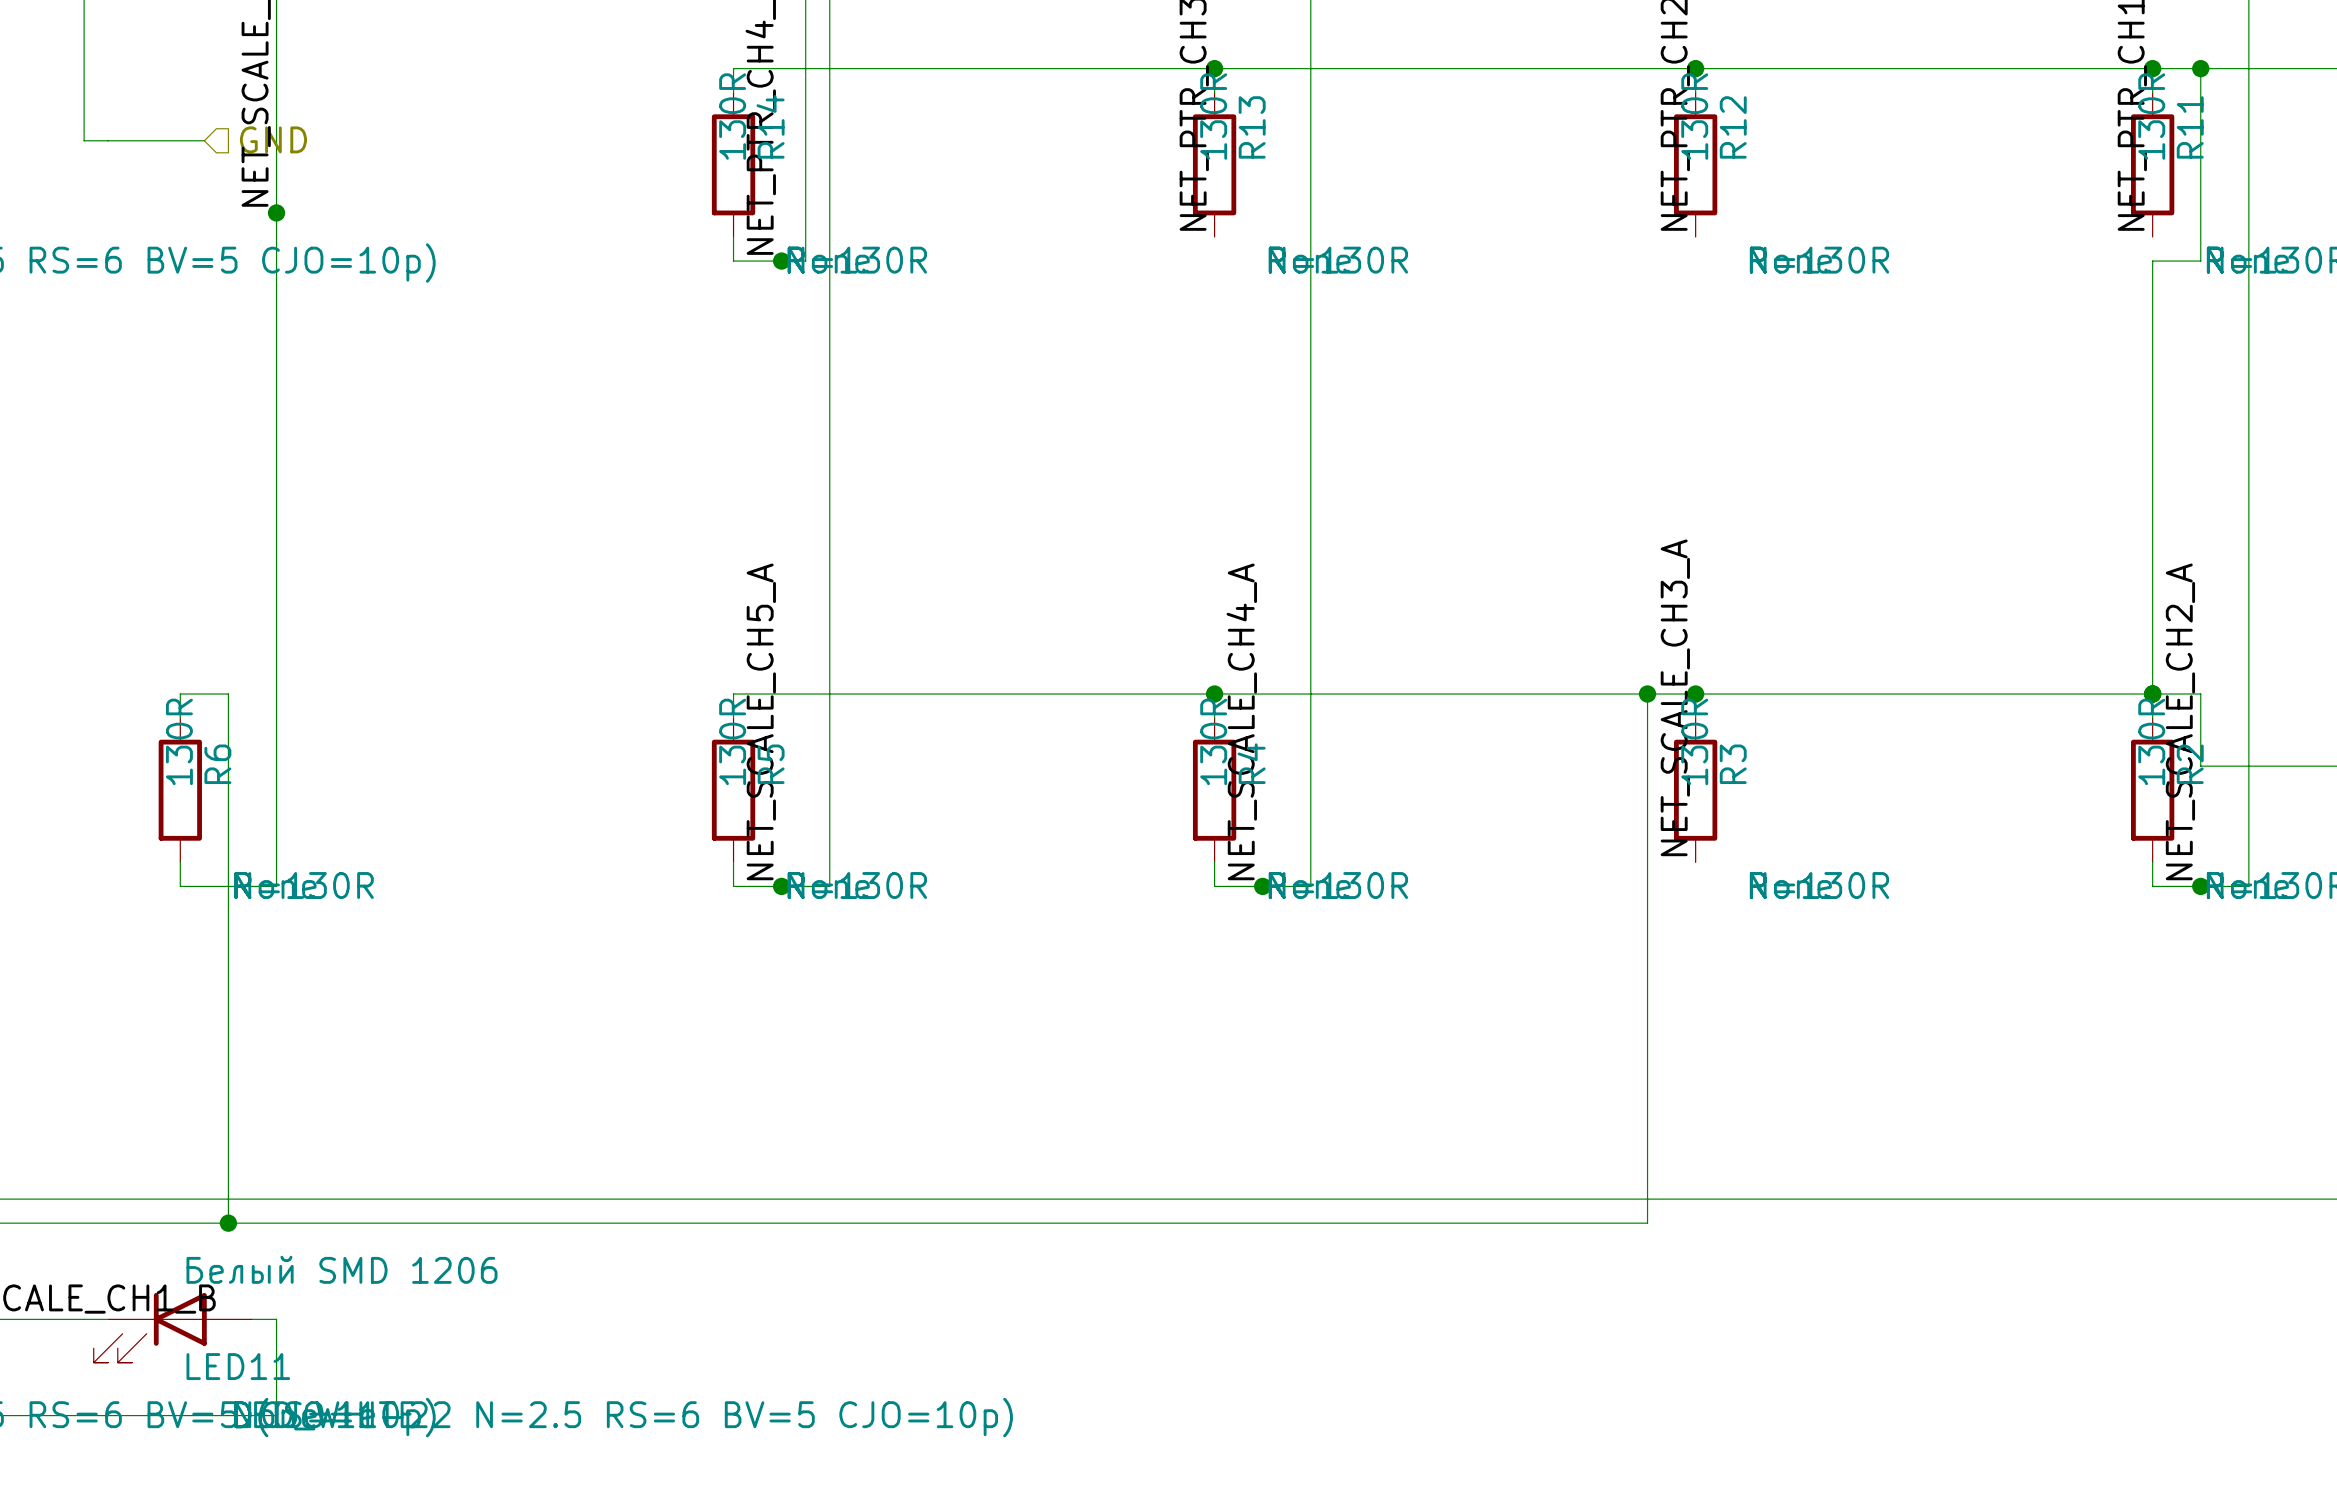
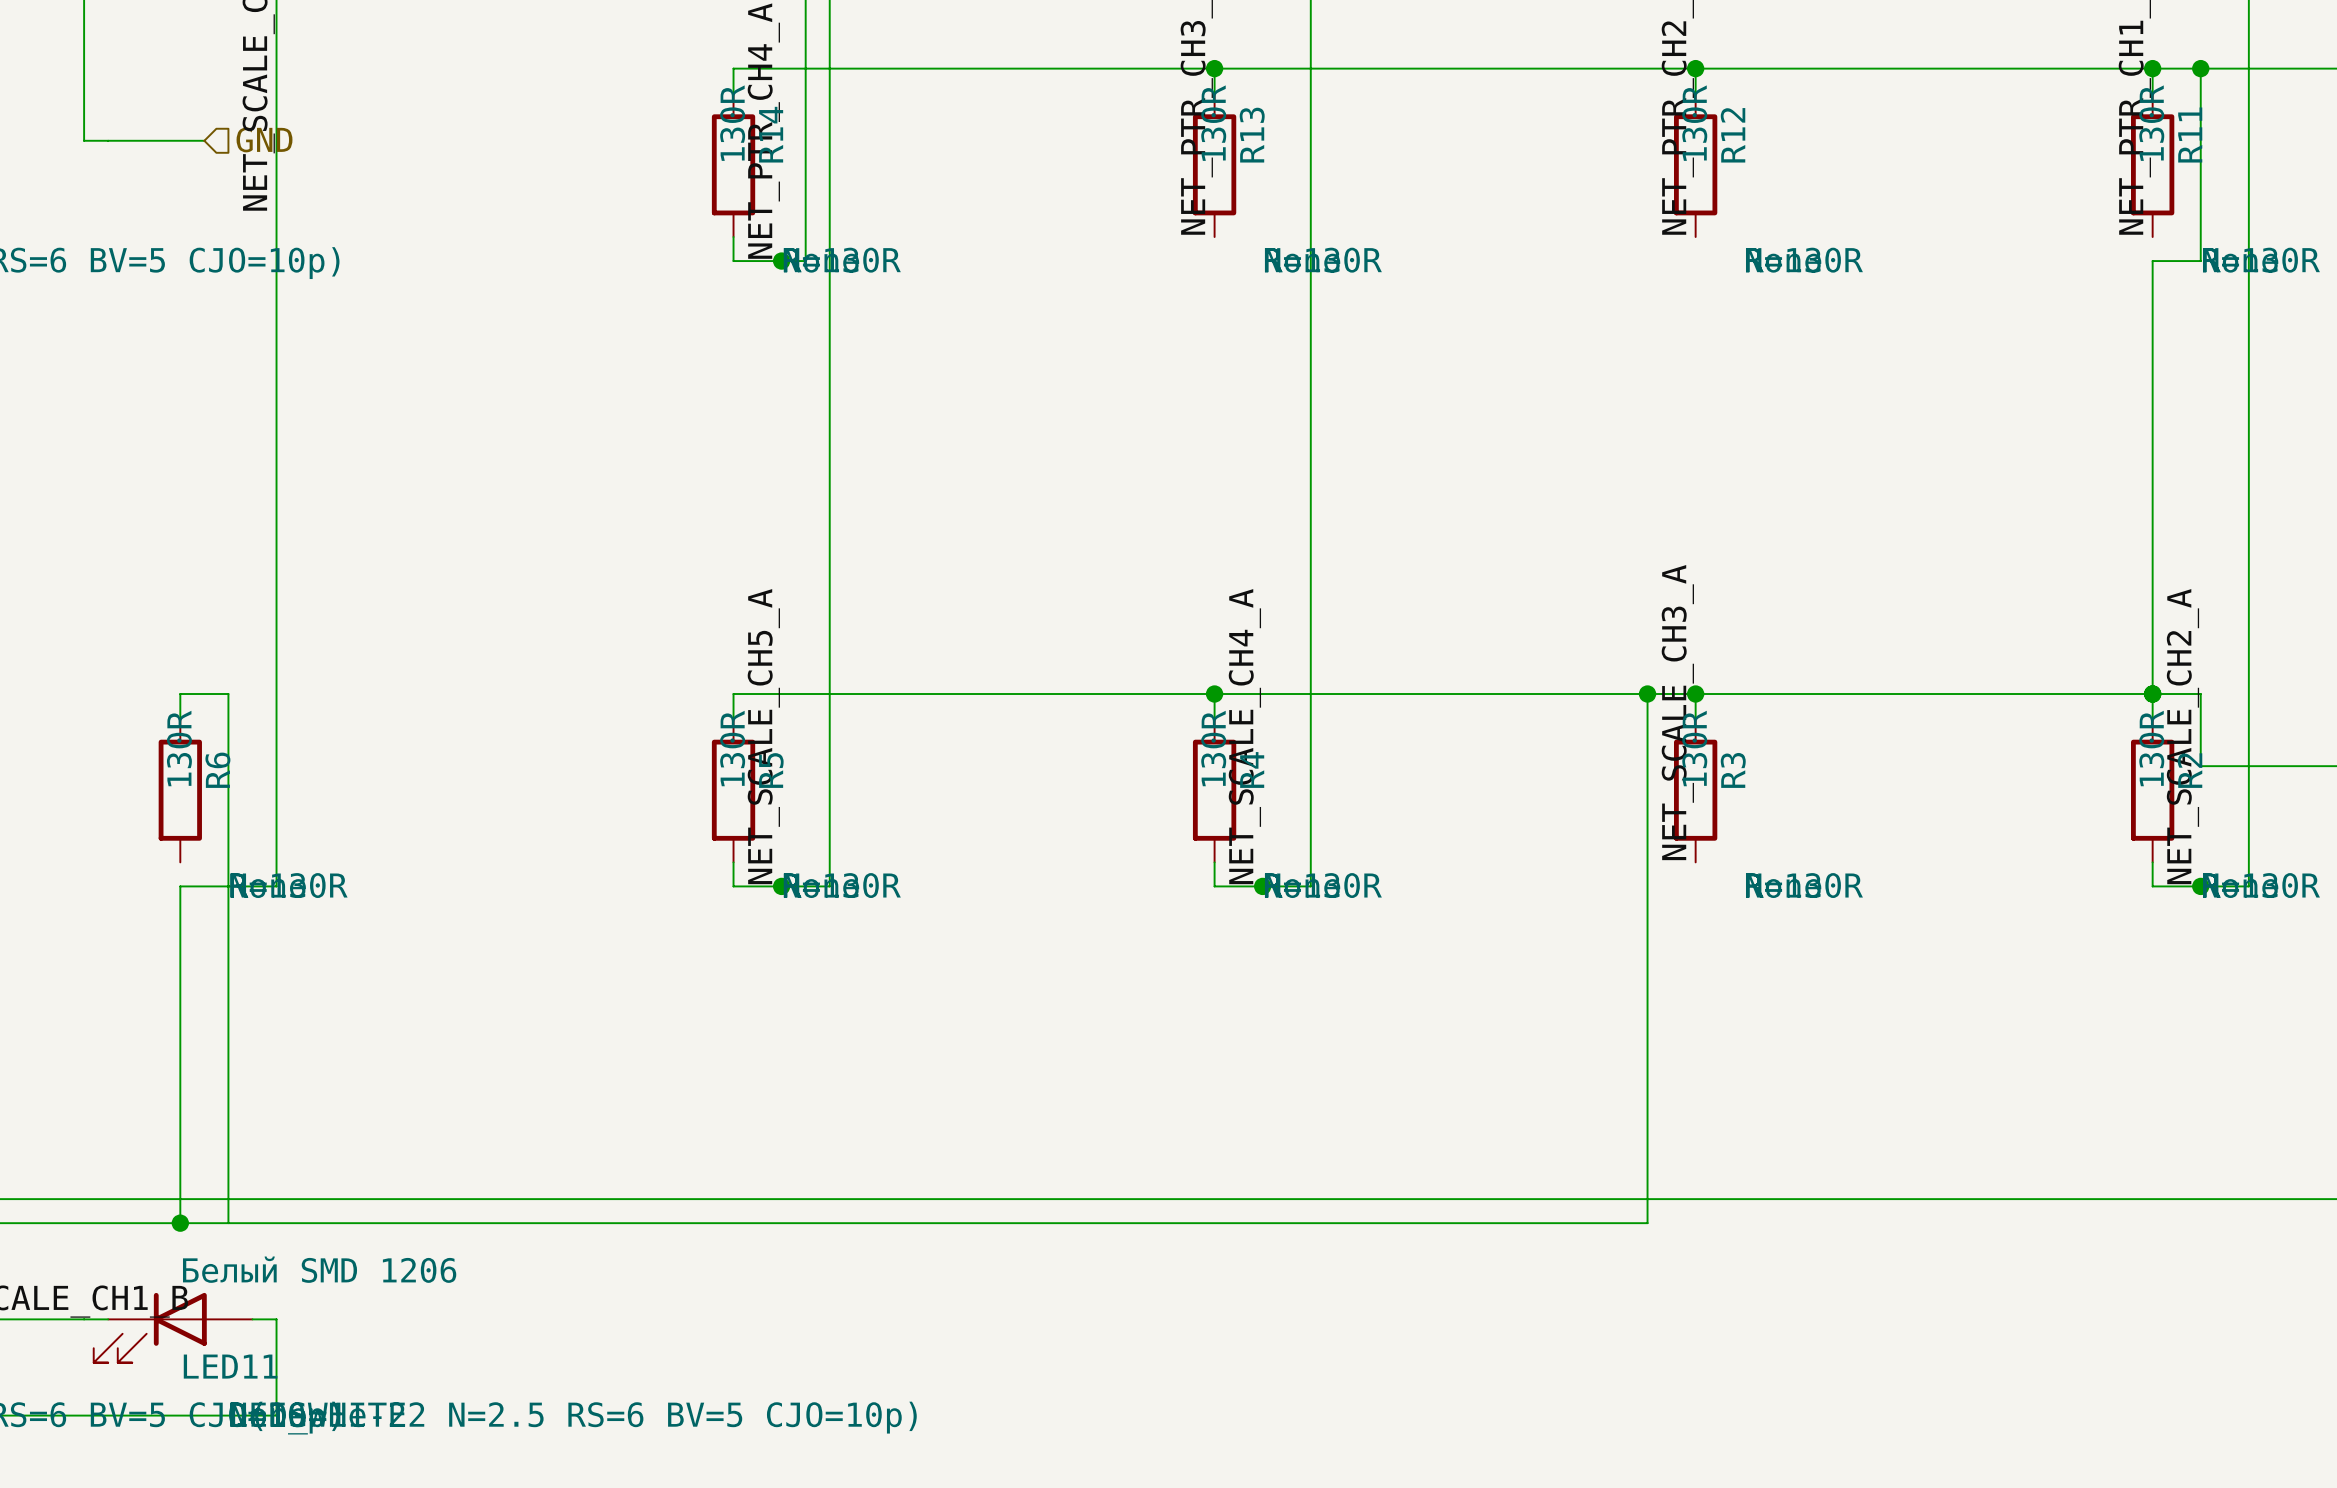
junction: (276, 212) -> none
wire: (180, 862) (180, 886) -> (180, 1223) (180, 886)
junction position: (228, 1223) -> (180, 1223)

